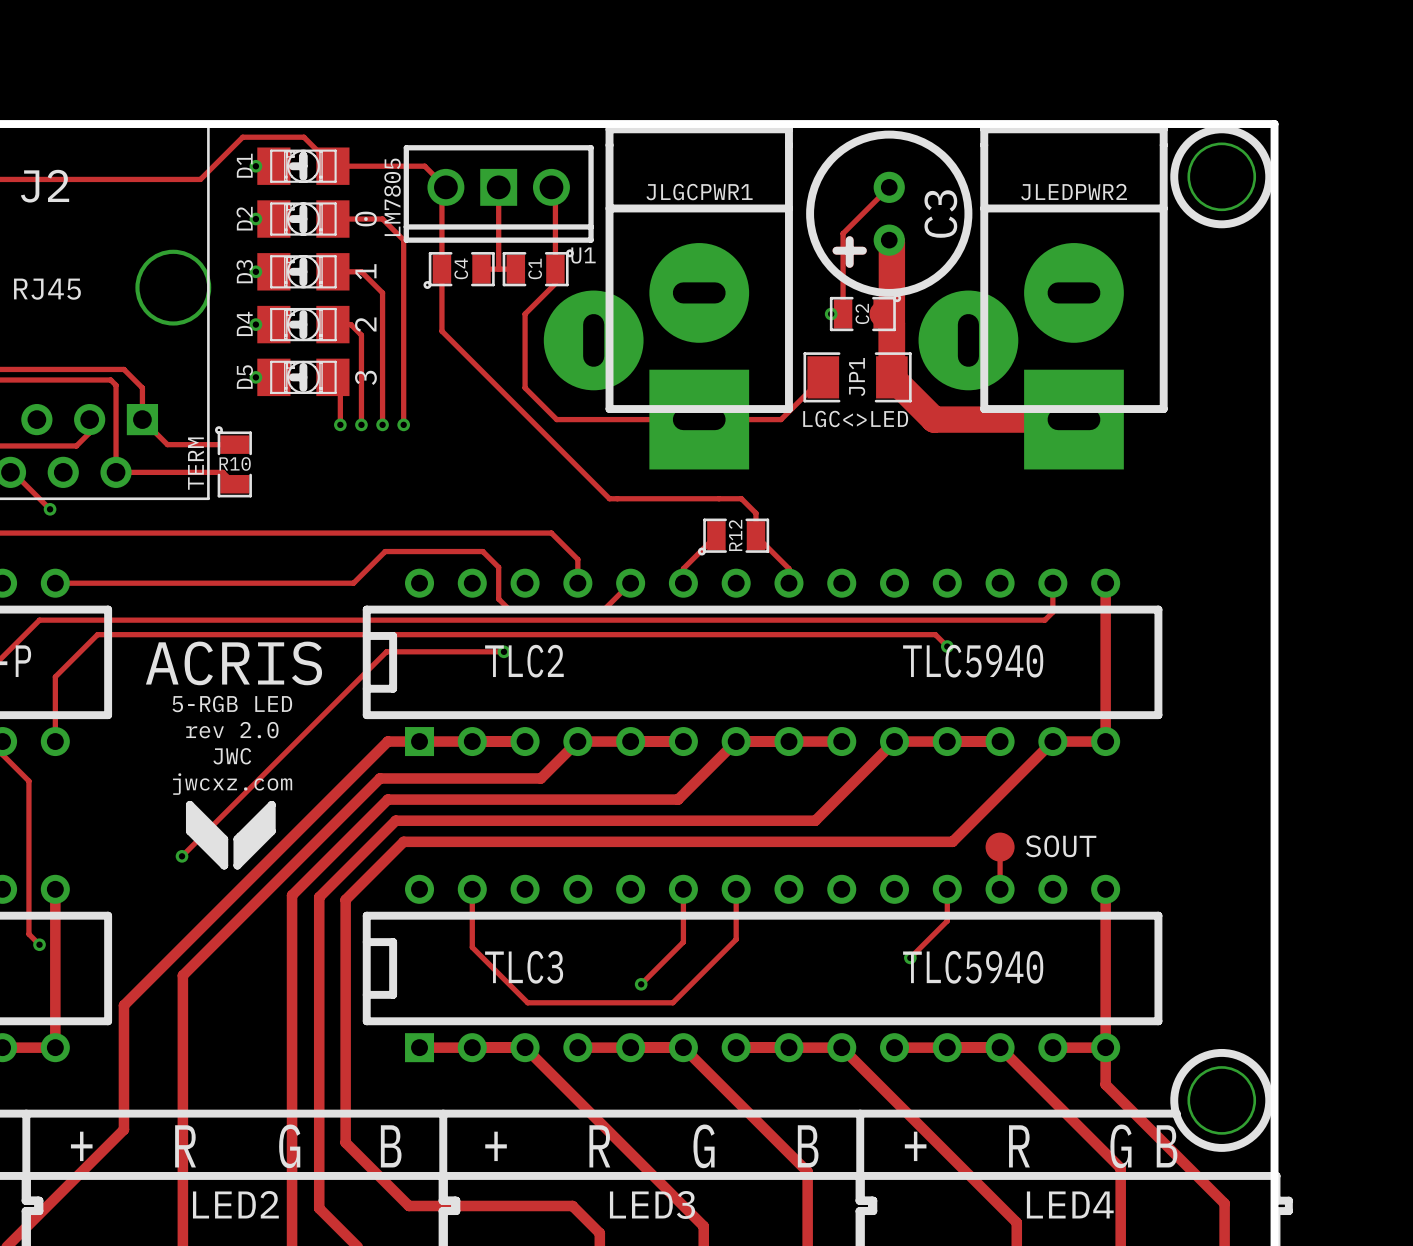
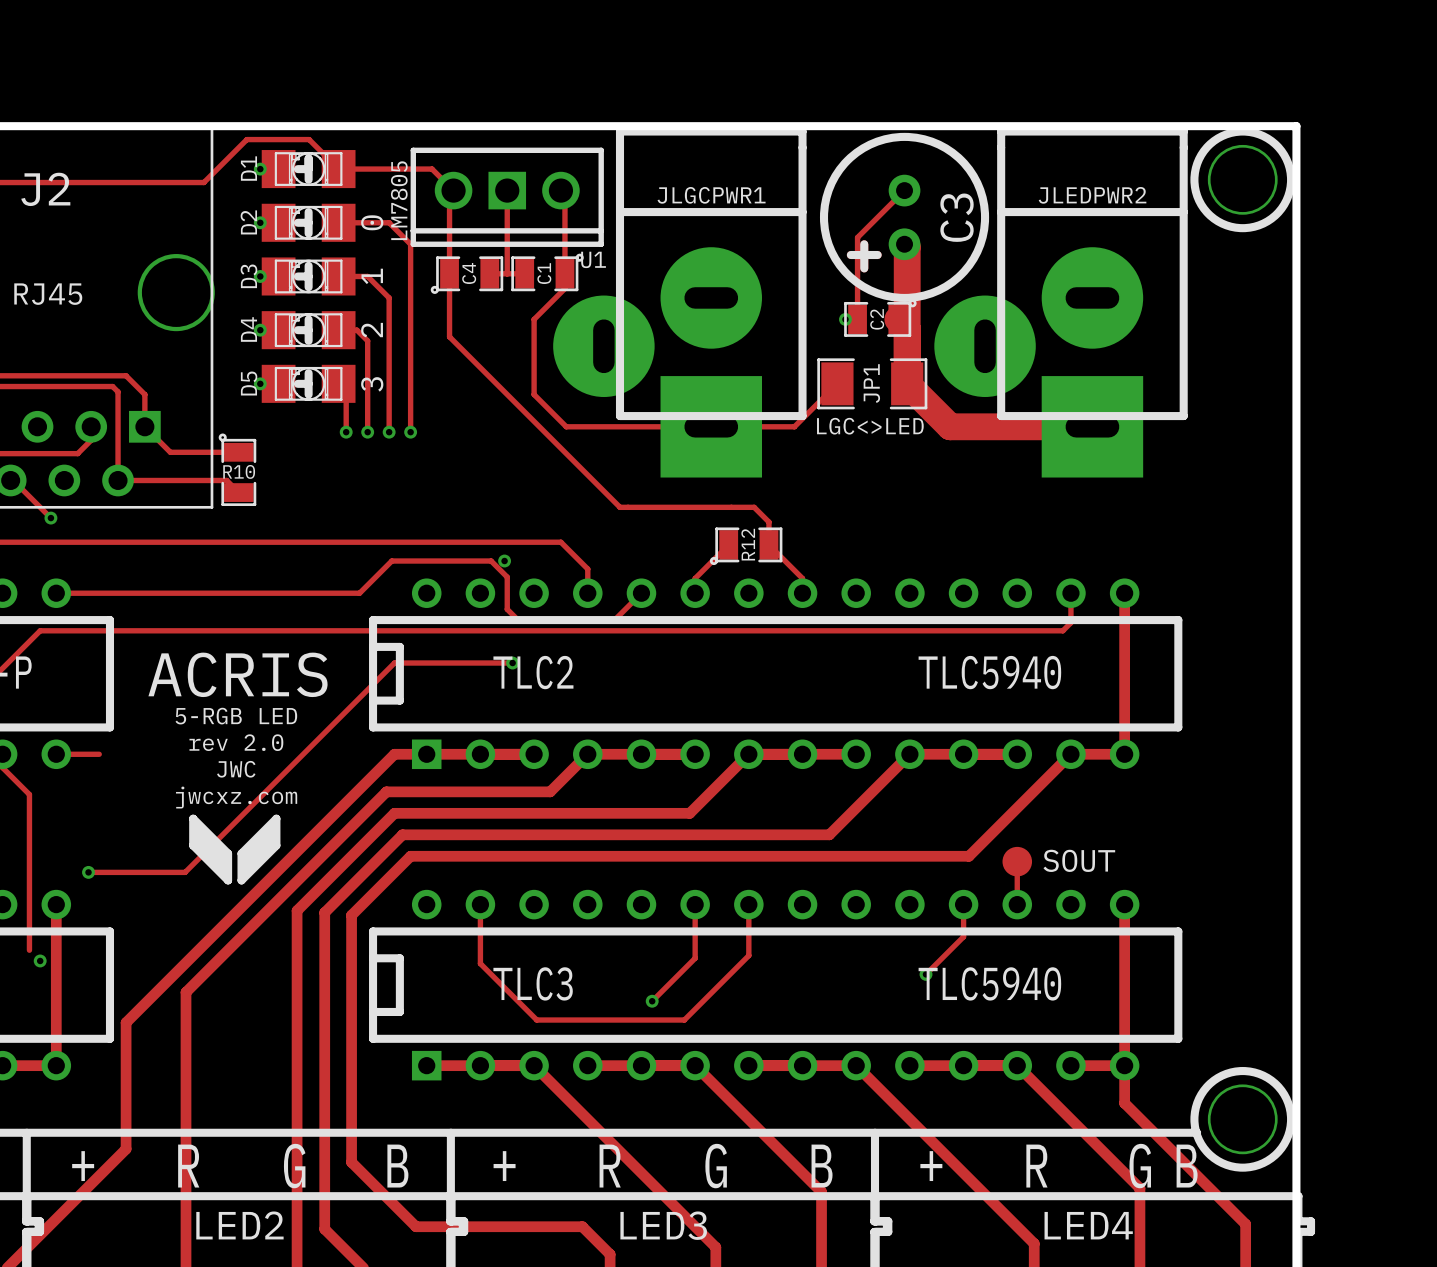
text: TERM (195, 463) -> none
via: none -> (504, 561)
track: (947, 646) (935, 634) (97, 634) (55, 676) (55, 741) -> (99, 754) (56, 754)
via: (947, 646) -> none
track: (387, 651) (182, 856) -> (394, 663) (185, 872) (88, 872)
via position: (182, 856) -> (88, 872)
track: (28, 934) (39, 944) -> none

